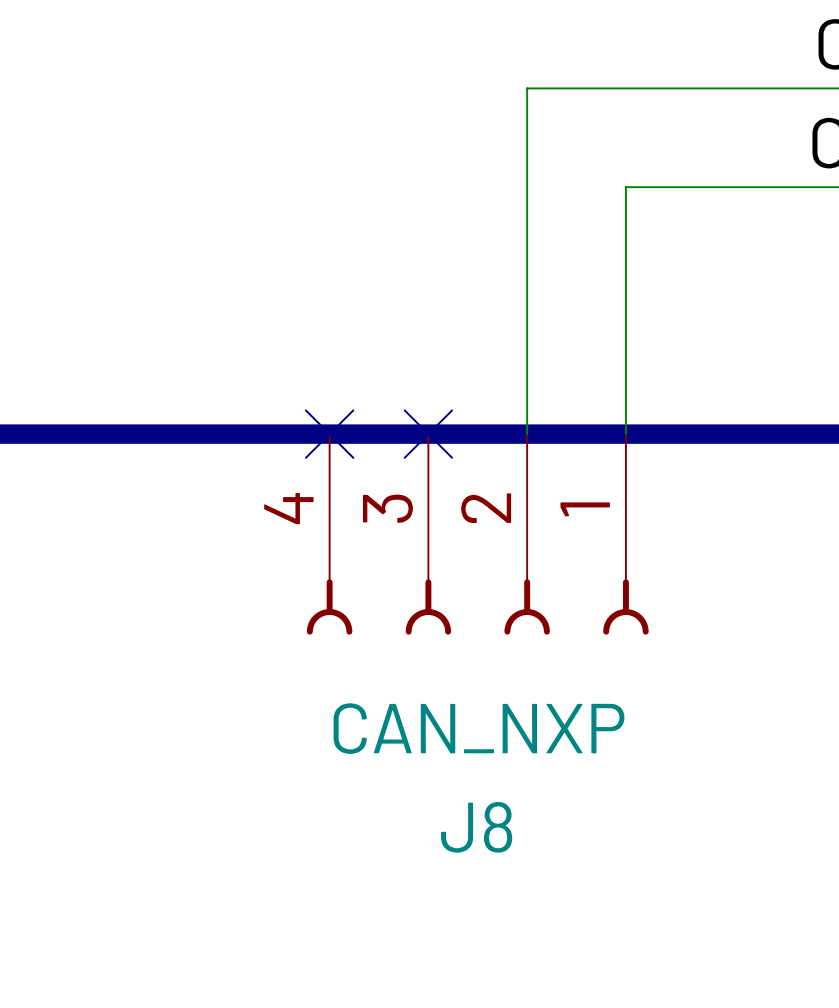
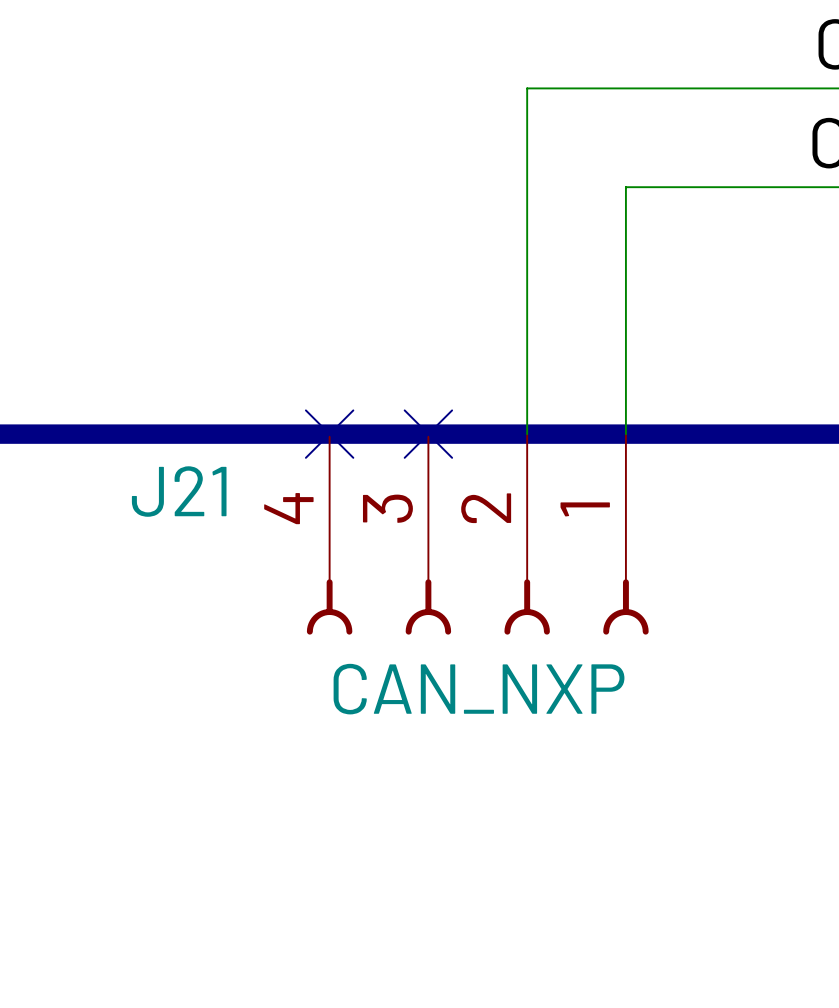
J8 value position: CAN_NXP (479, 728) -> CAN_NXP (479, 689)
J8 name: J8 (476, 827) -> J21 (179, 491)

